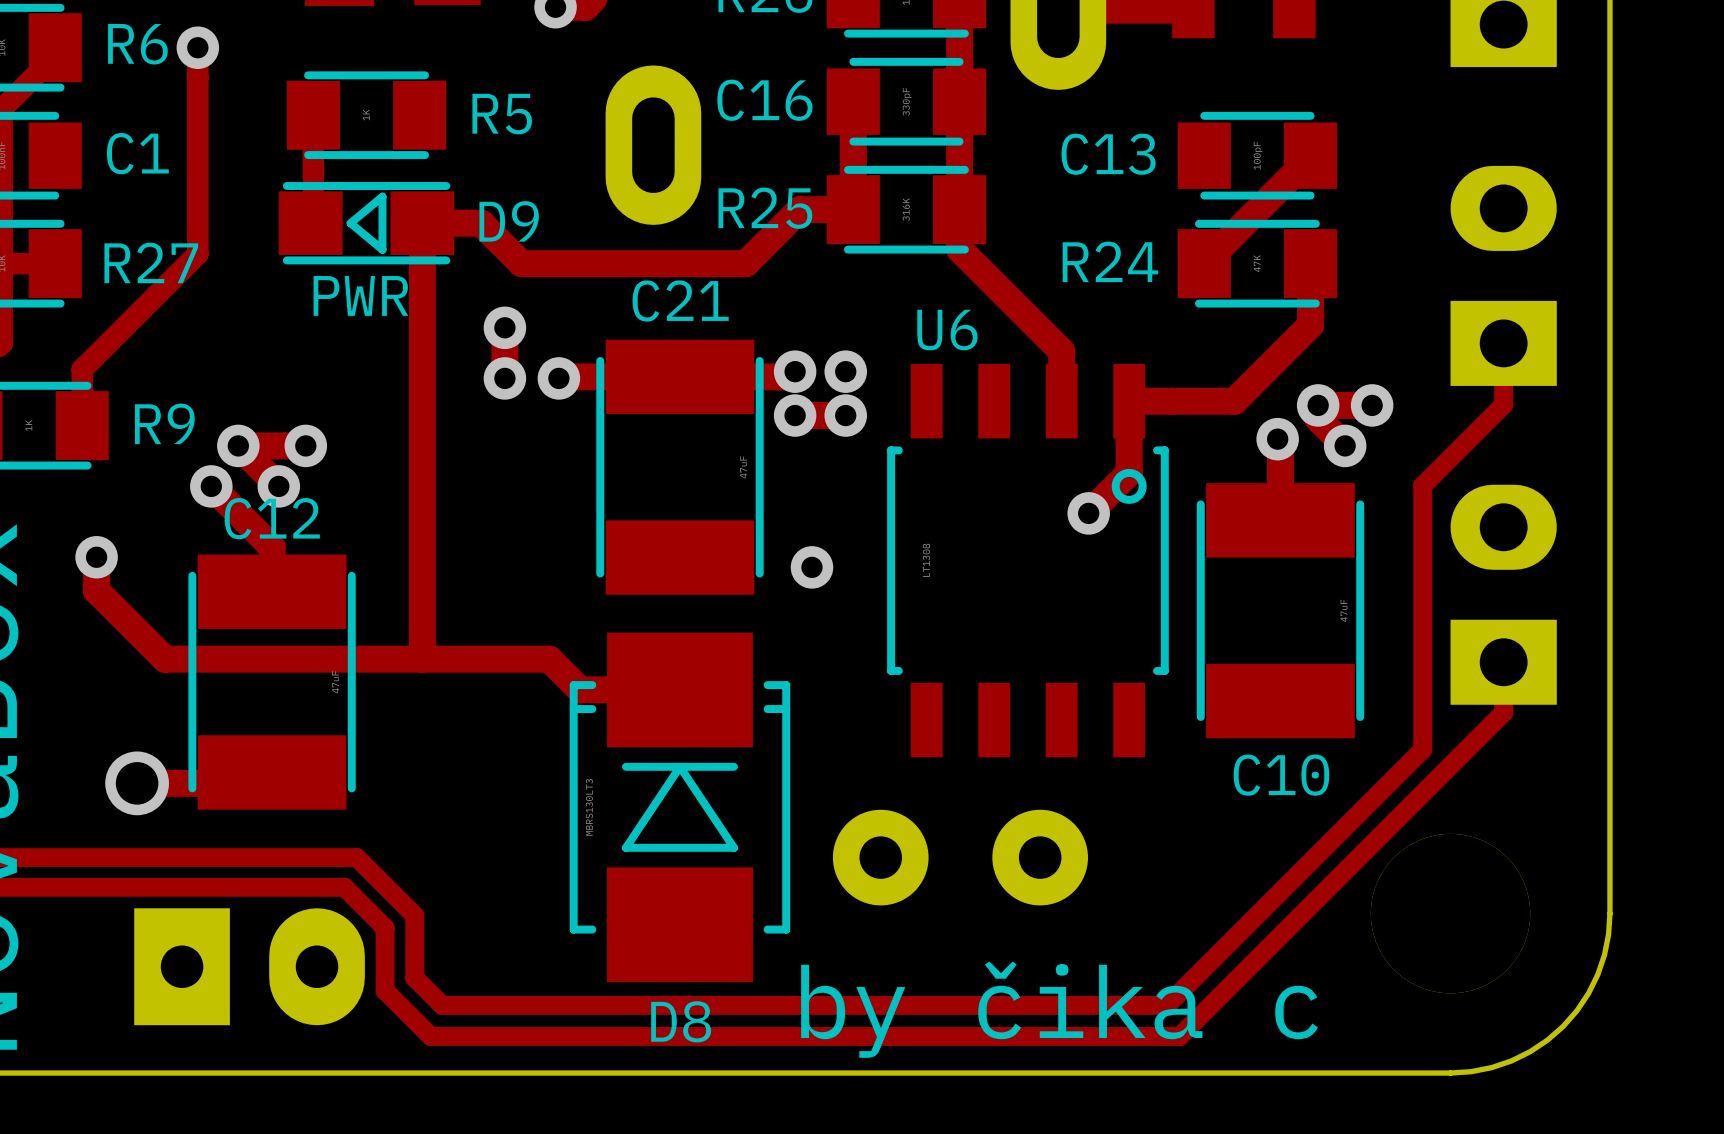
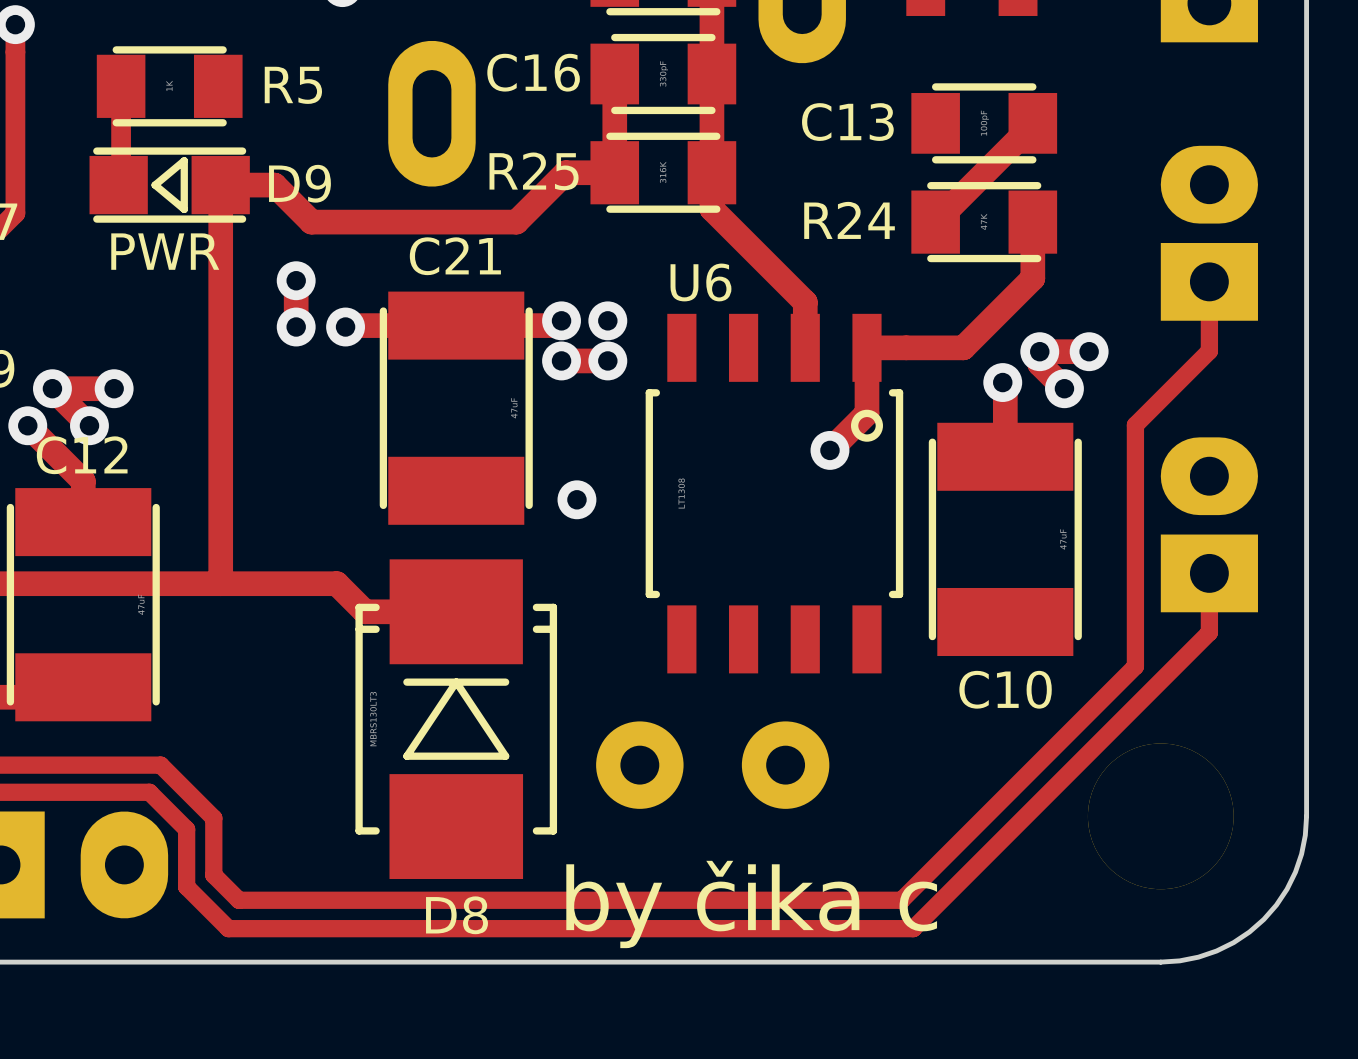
part footprint: [1450, 165, 1557, 386] -> [1160, 145, 1258, 321]
part footprint: [1450, 484, 1557, 705] -> [1160, 437, 1258, 613]

